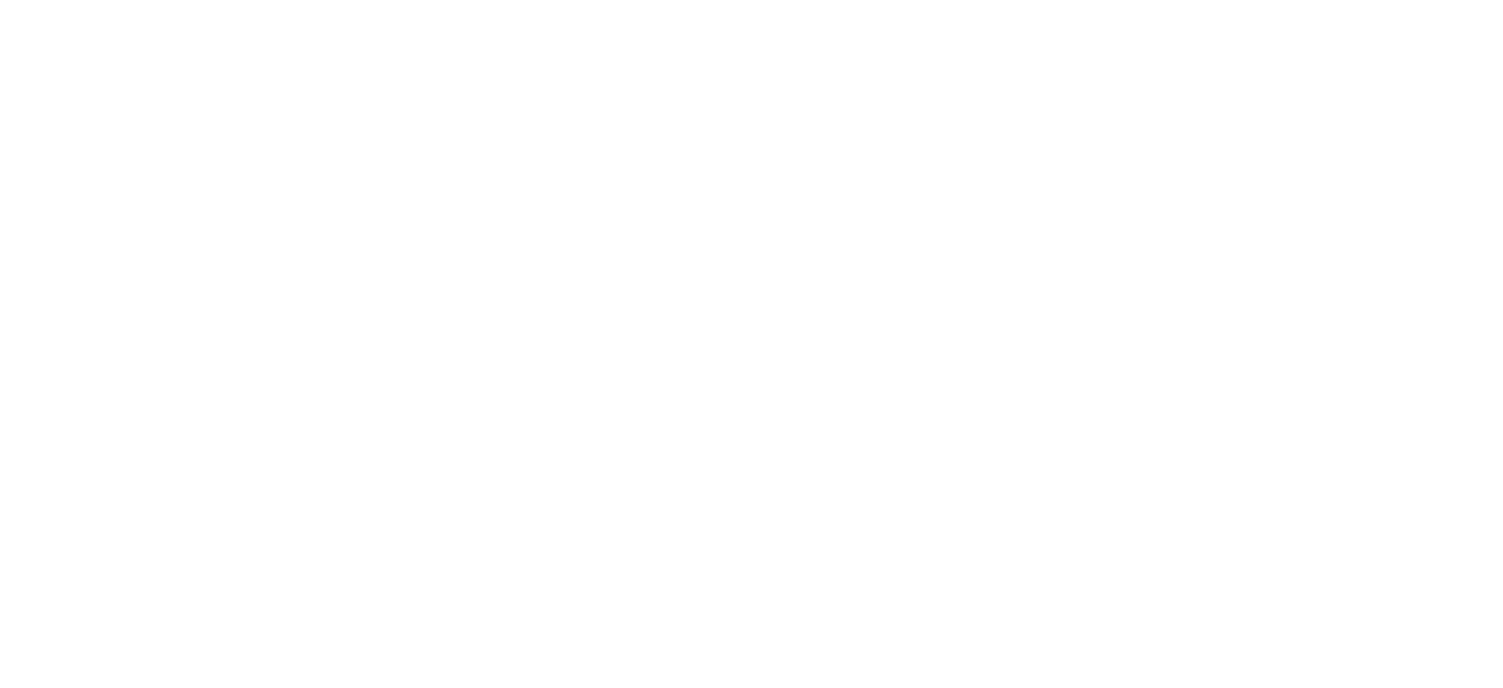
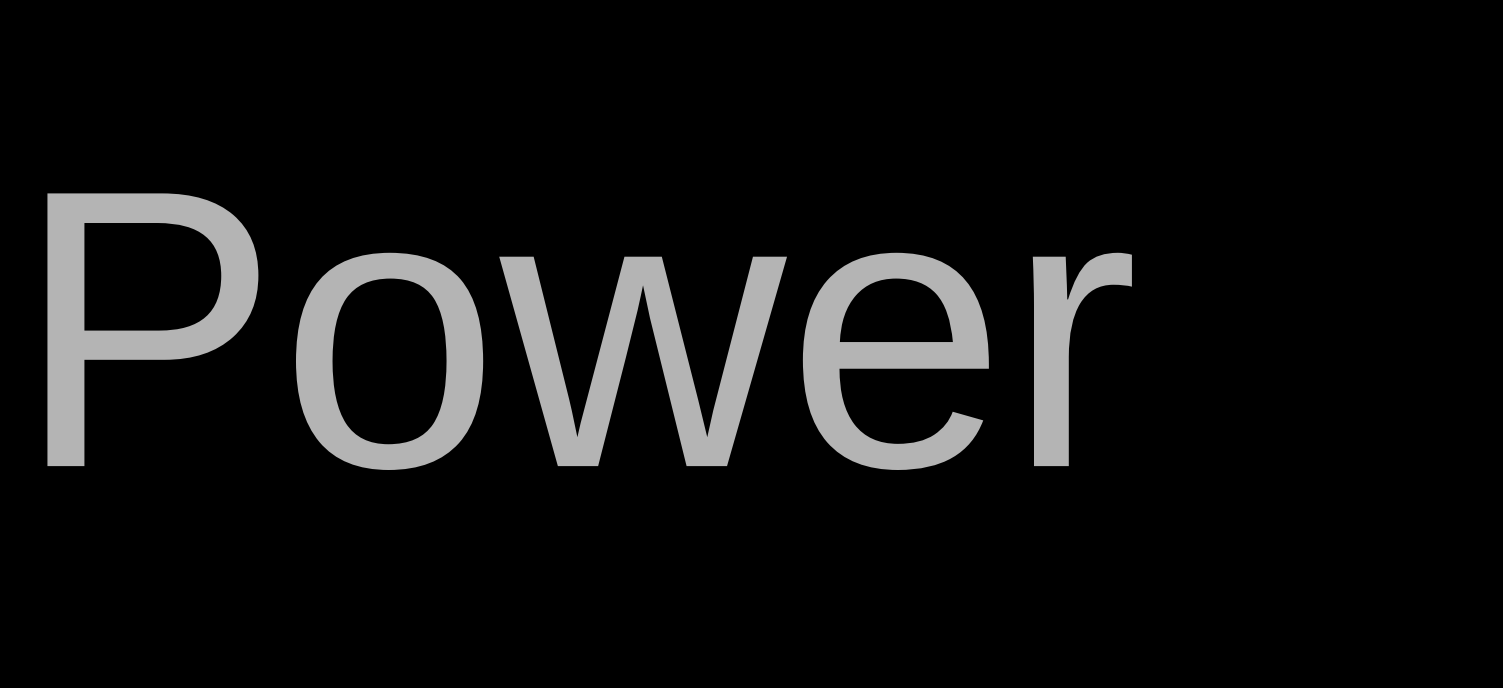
label: none -> Power (589, 331)

